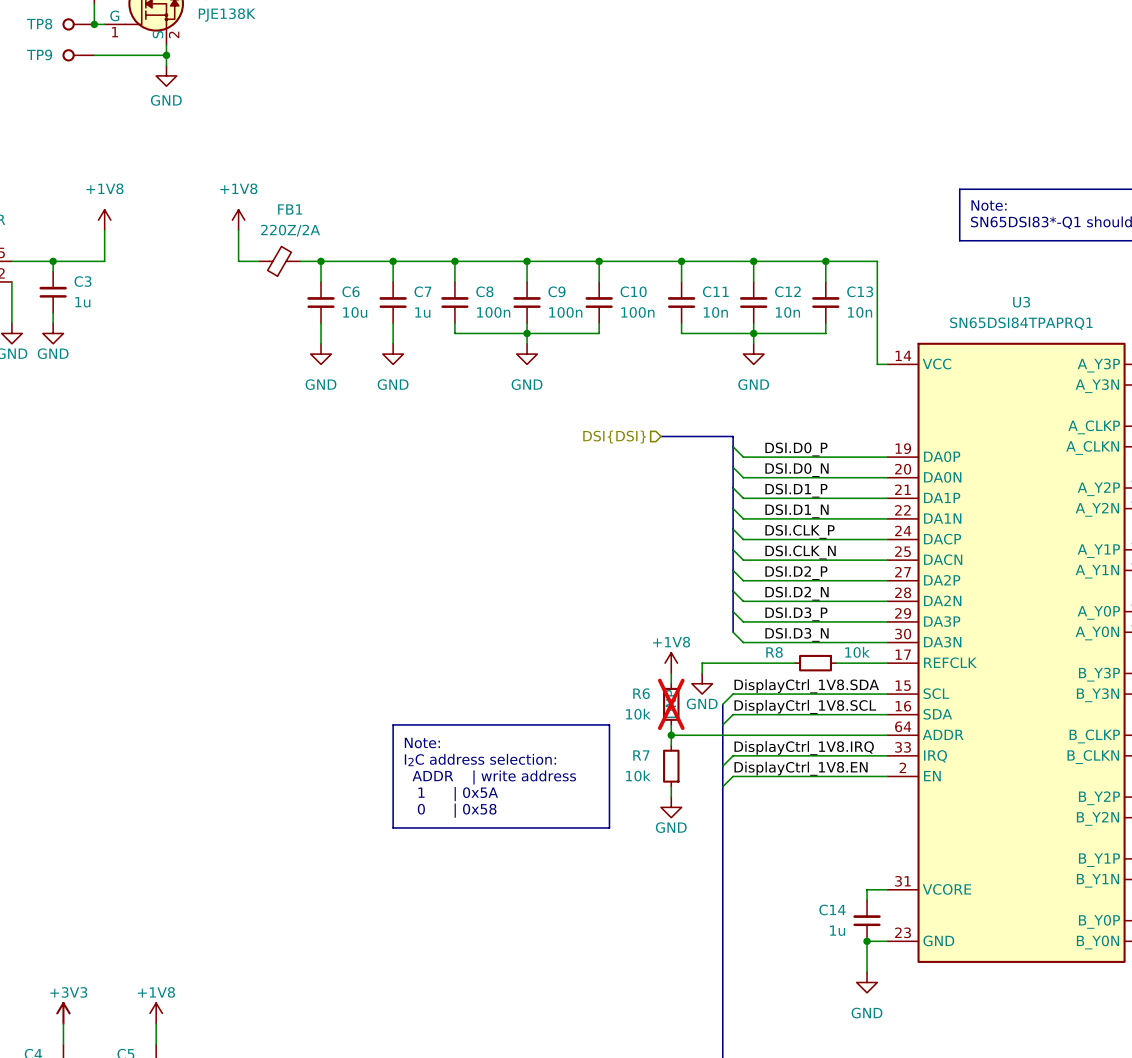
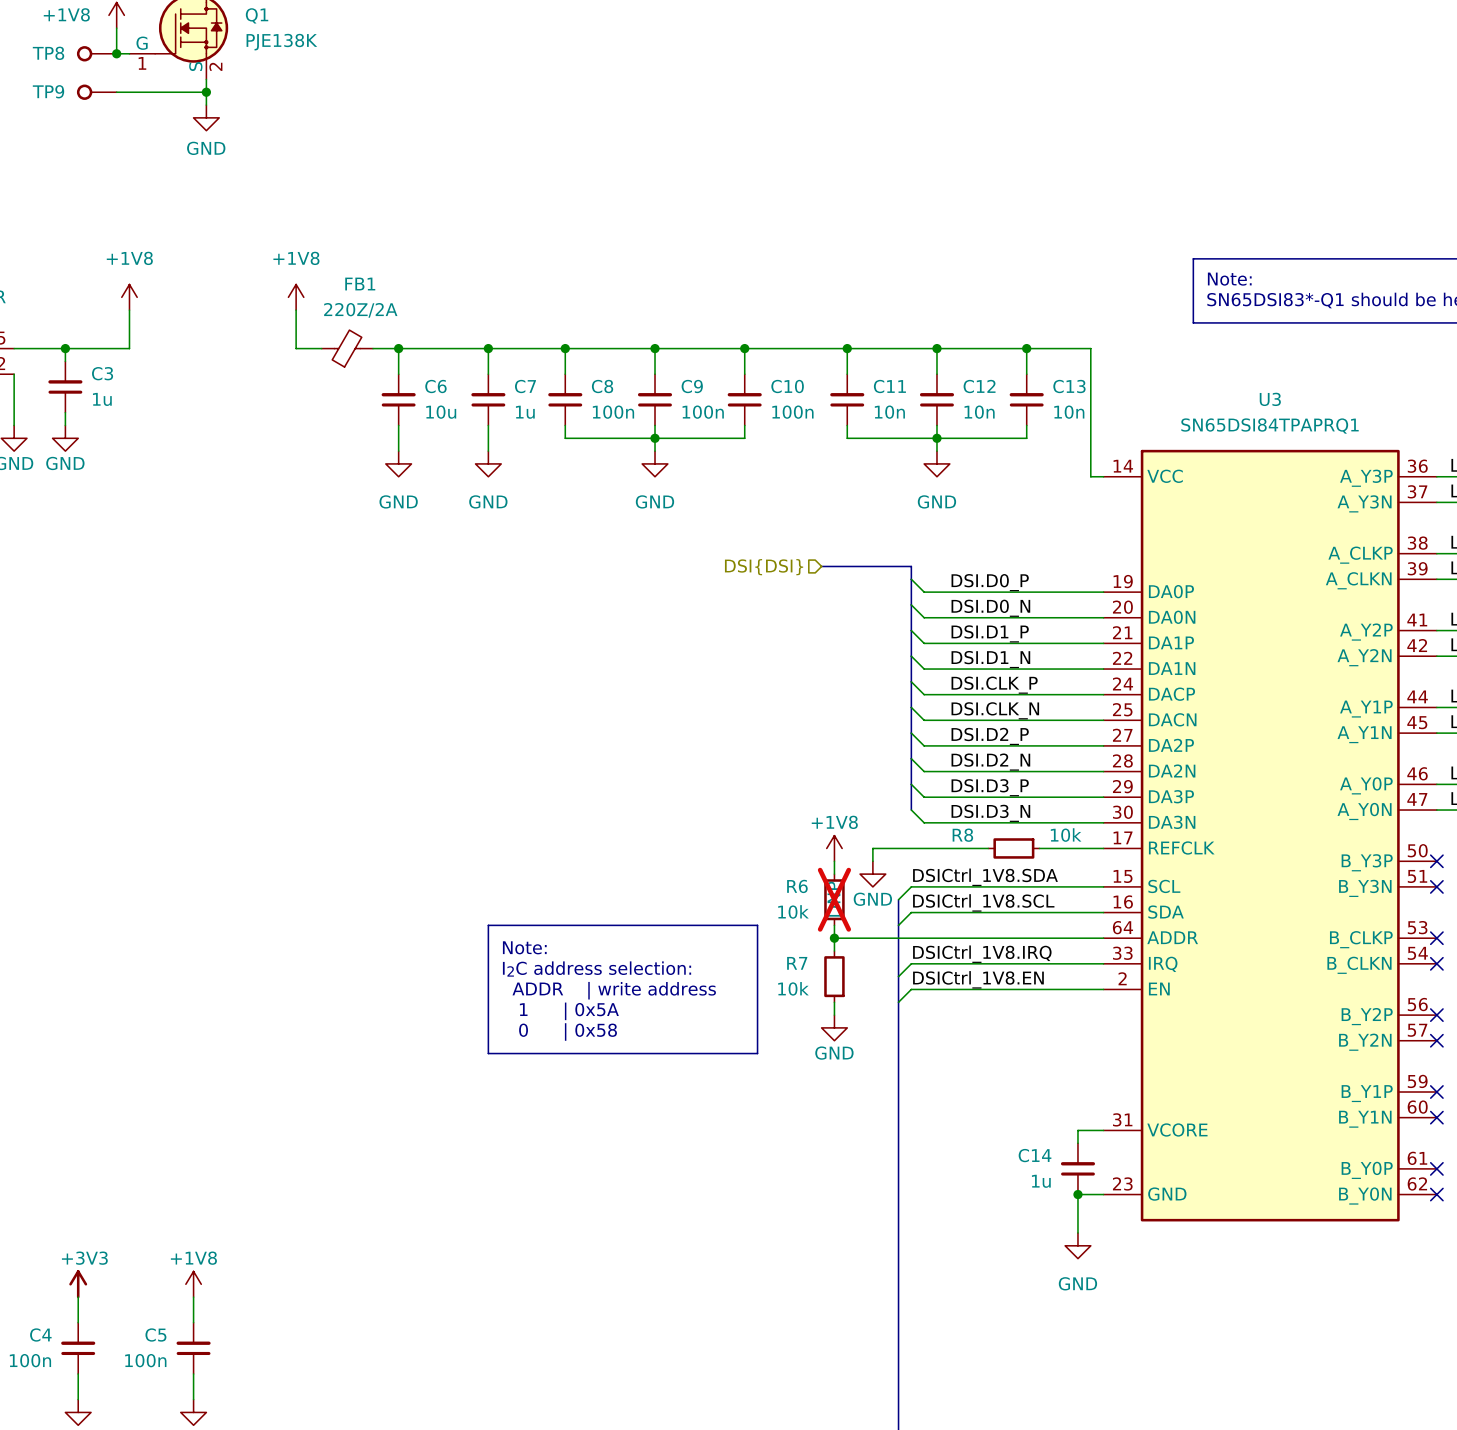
label: DisplayCtrl_1V8.SDA (806, 686) -> DSICtrl_1V8.SDA (985, 877)
label: DisplayCtrl_1V8.SCL (805, 706) -> DSICtrl_1V8.SCL (983, 902)
label: DisplayCtrl_1V8.IRQ (804, 748) -> DSICtrl_1V8.IRQ (982, 954)
label: DisplayCtrl_1V8.EN (801, 768) -> DSICtrl_1V8.EN (978, 979)

